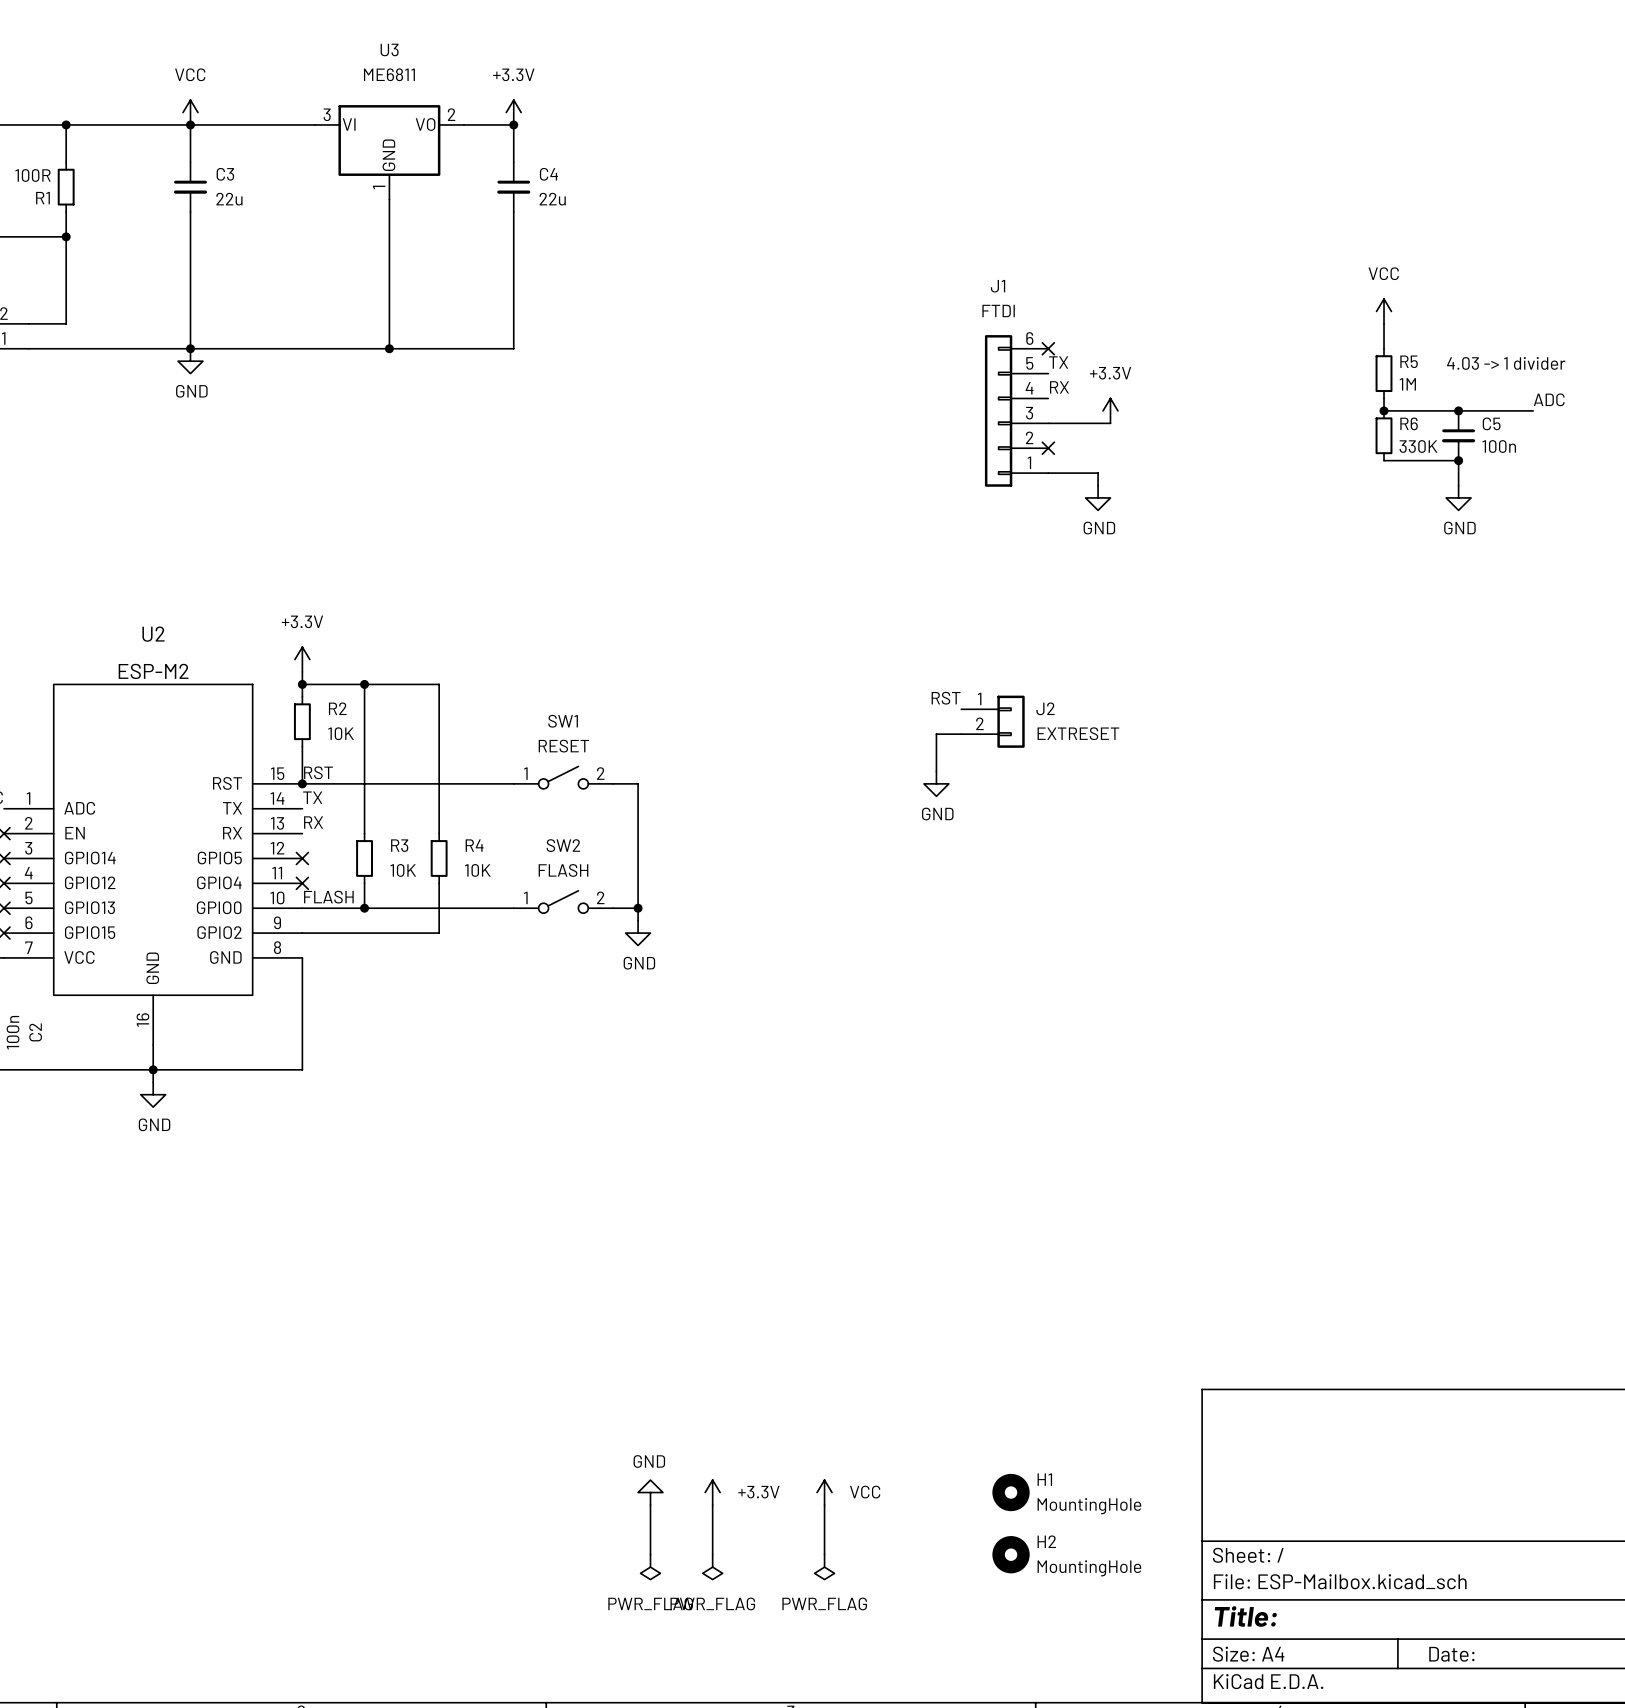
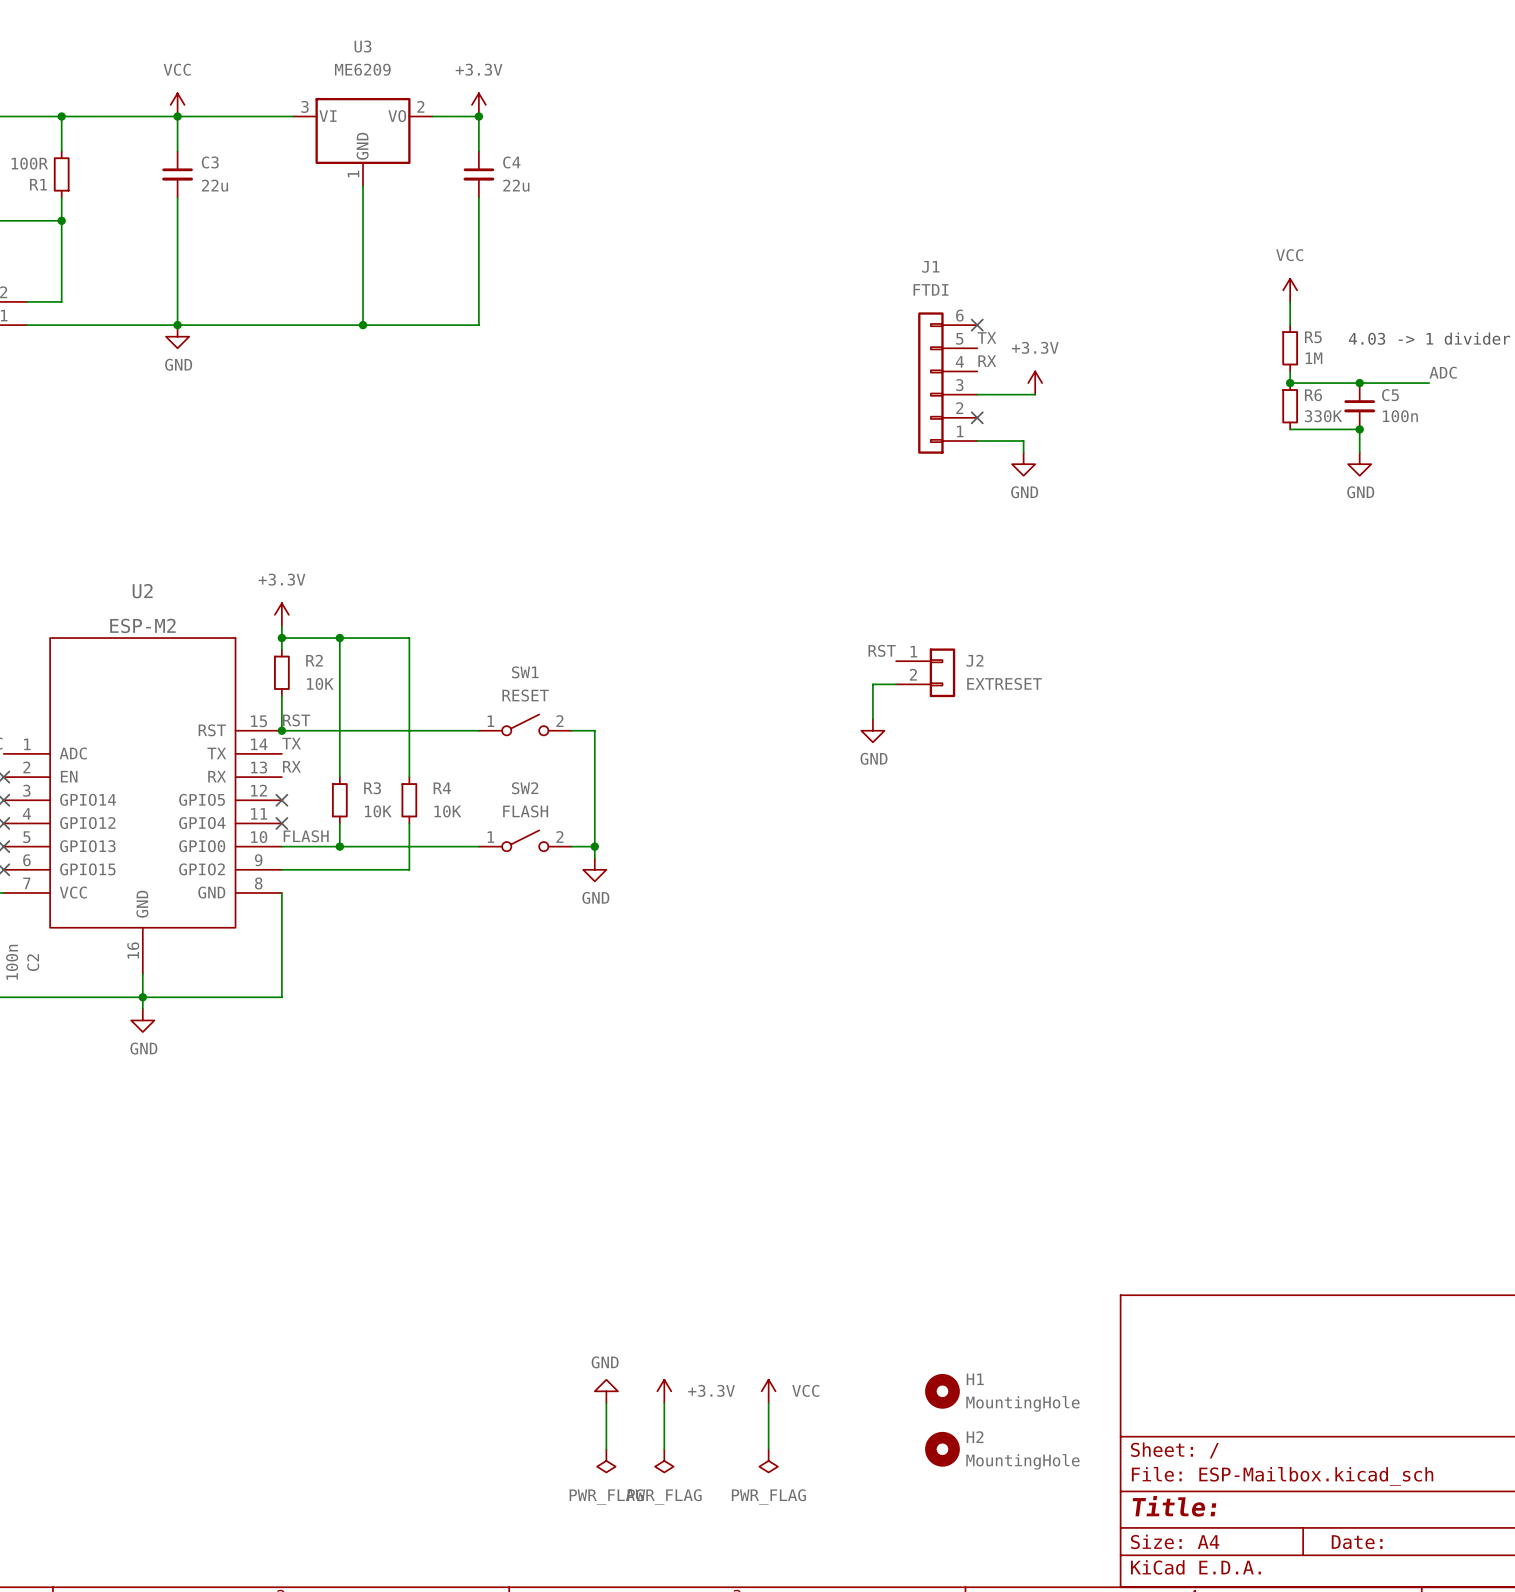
U3 value: ME6811 (389, 74) -> ME6209 (362, 69)

